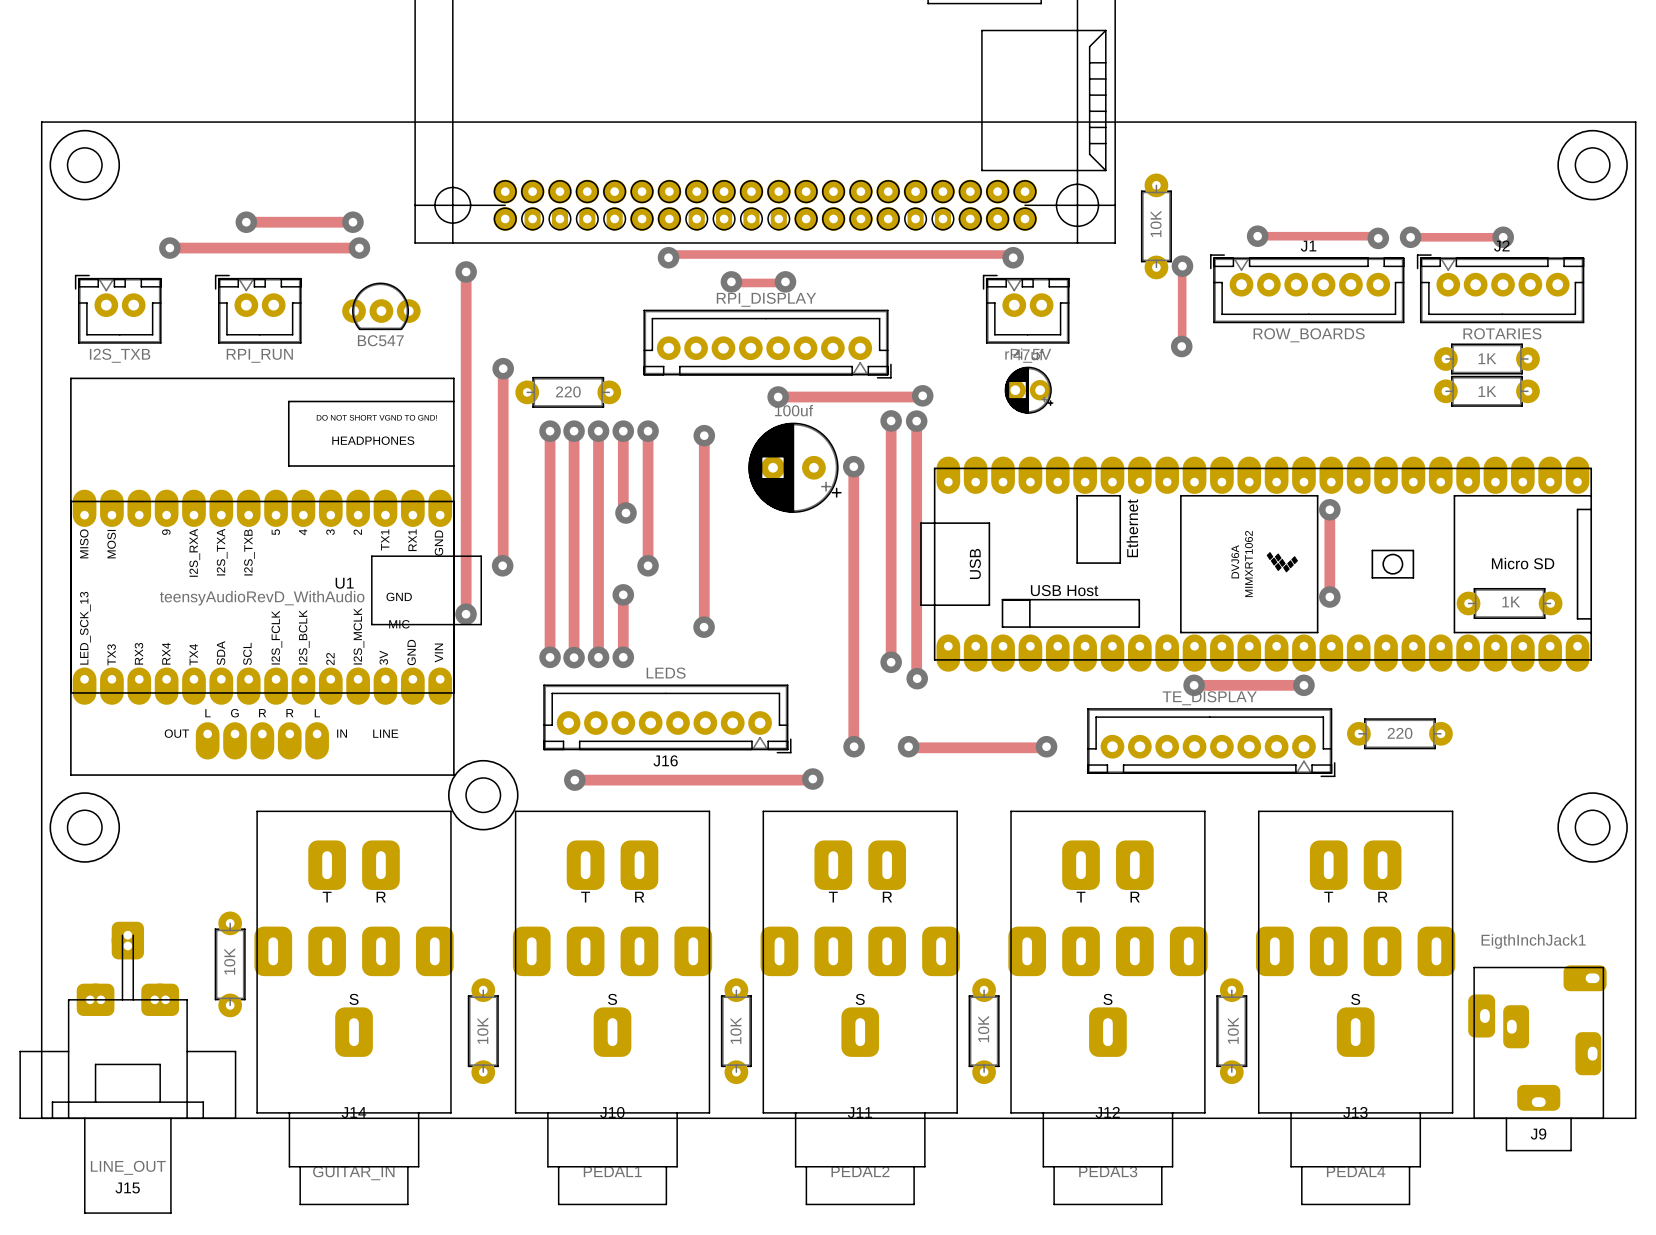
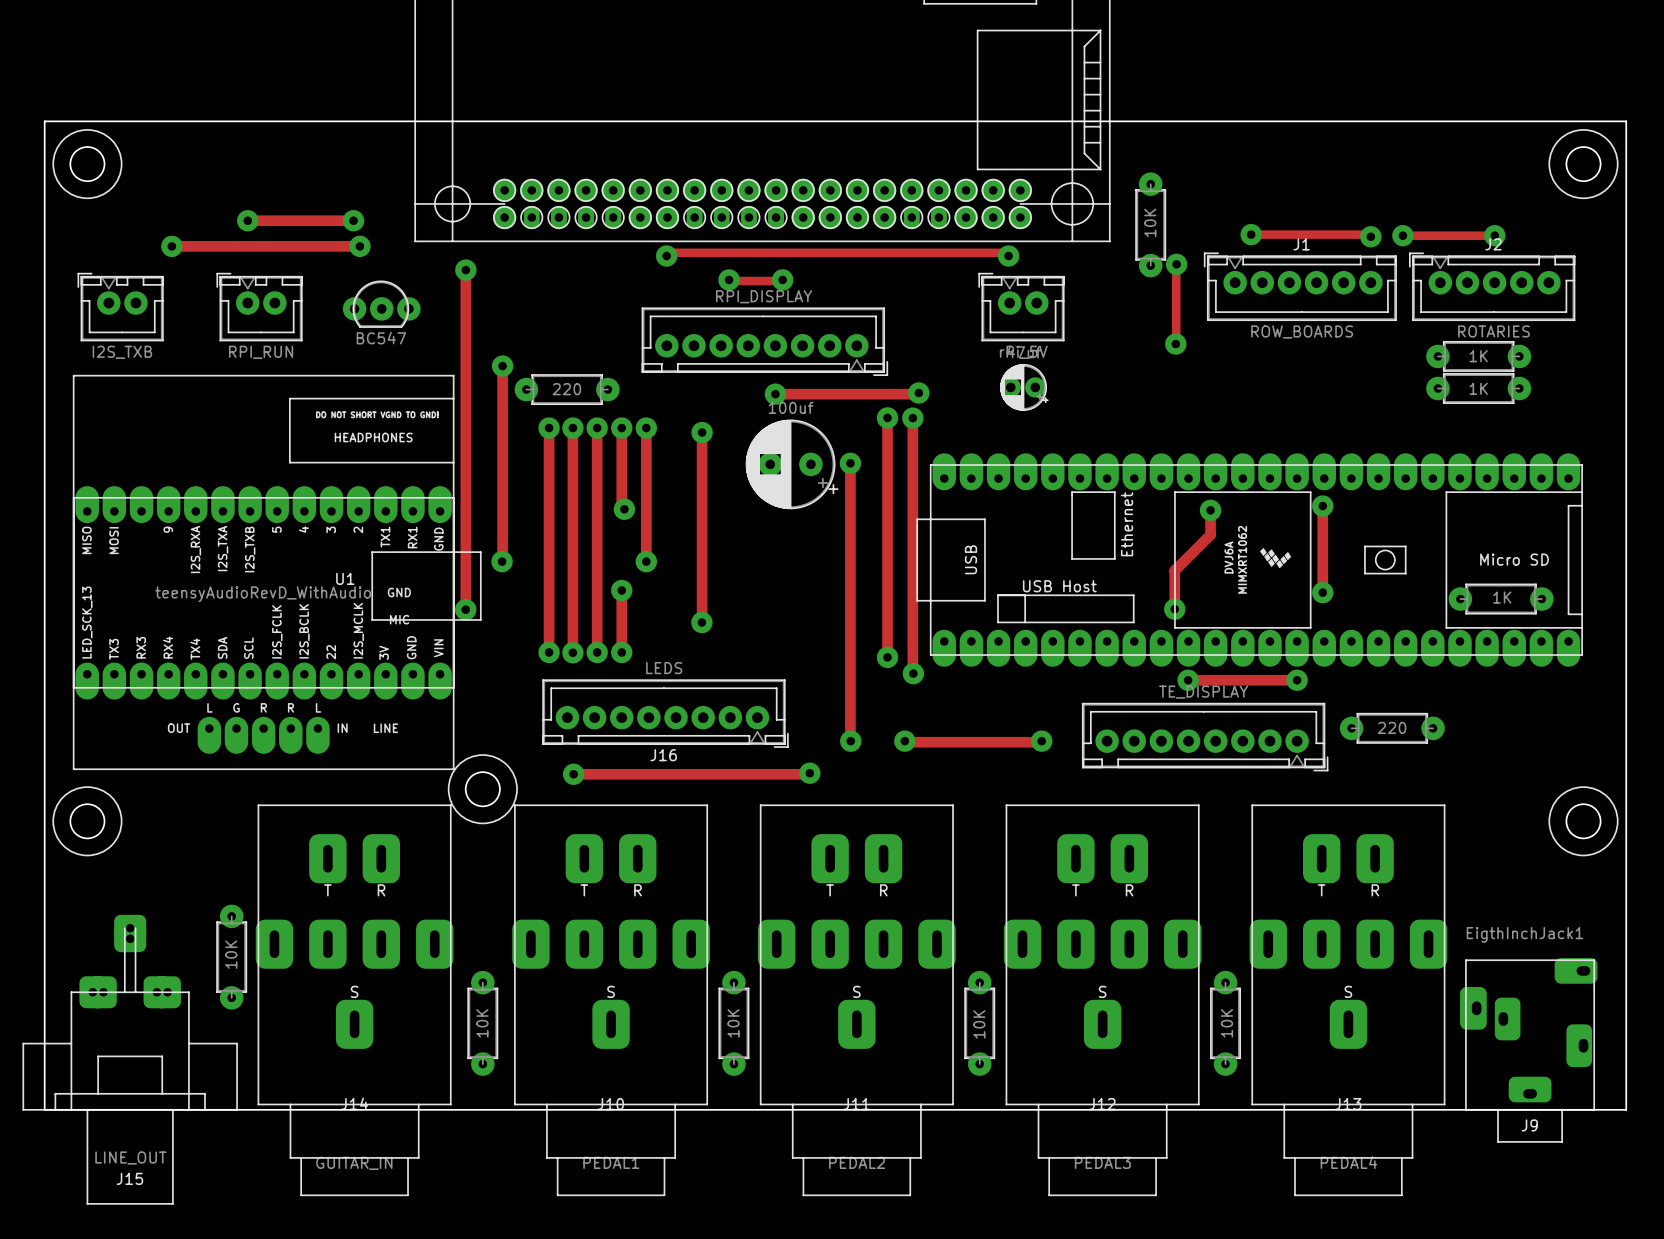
track: none -> (1210, 510) (1210, 534) (1174, 570) (1174, 609)
via: none -> (1210, 510)
via: none -> (1174, 609)

